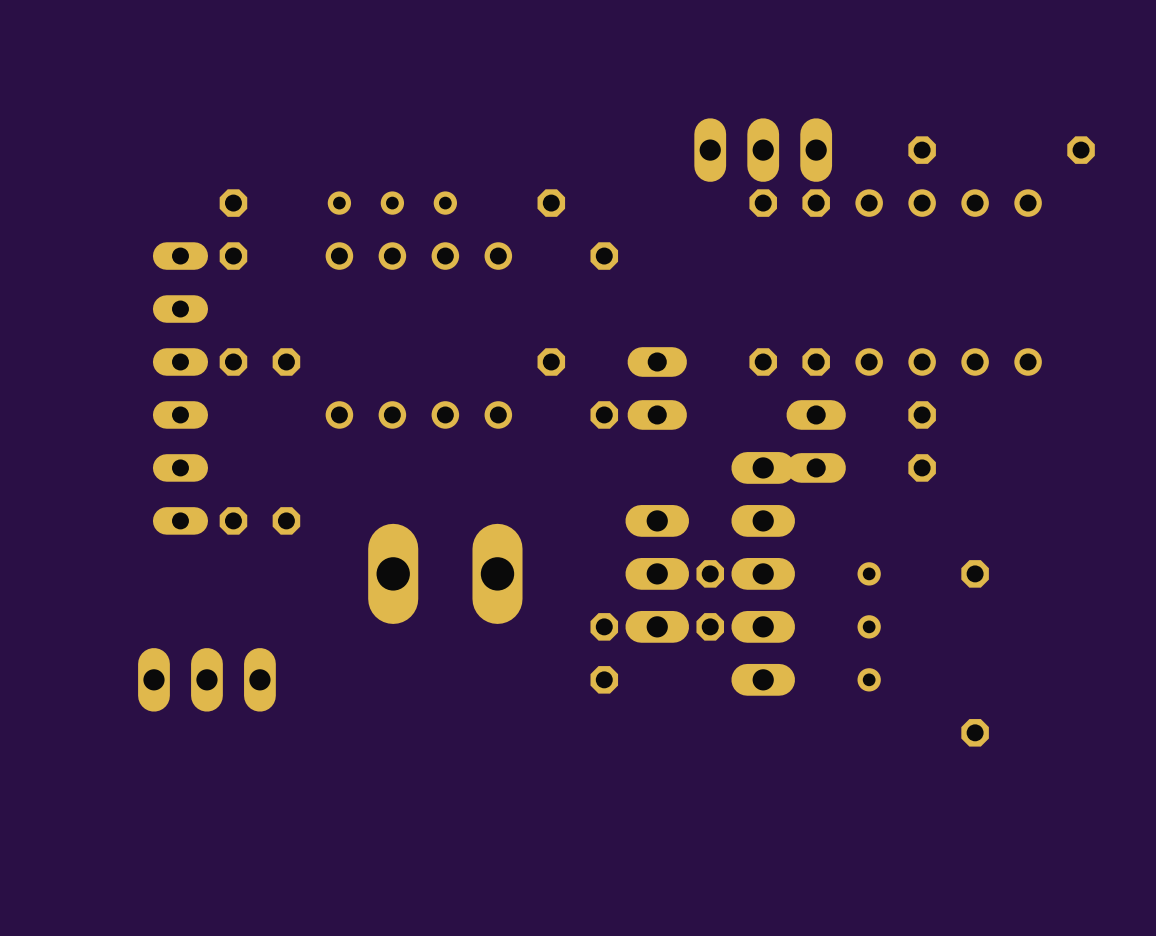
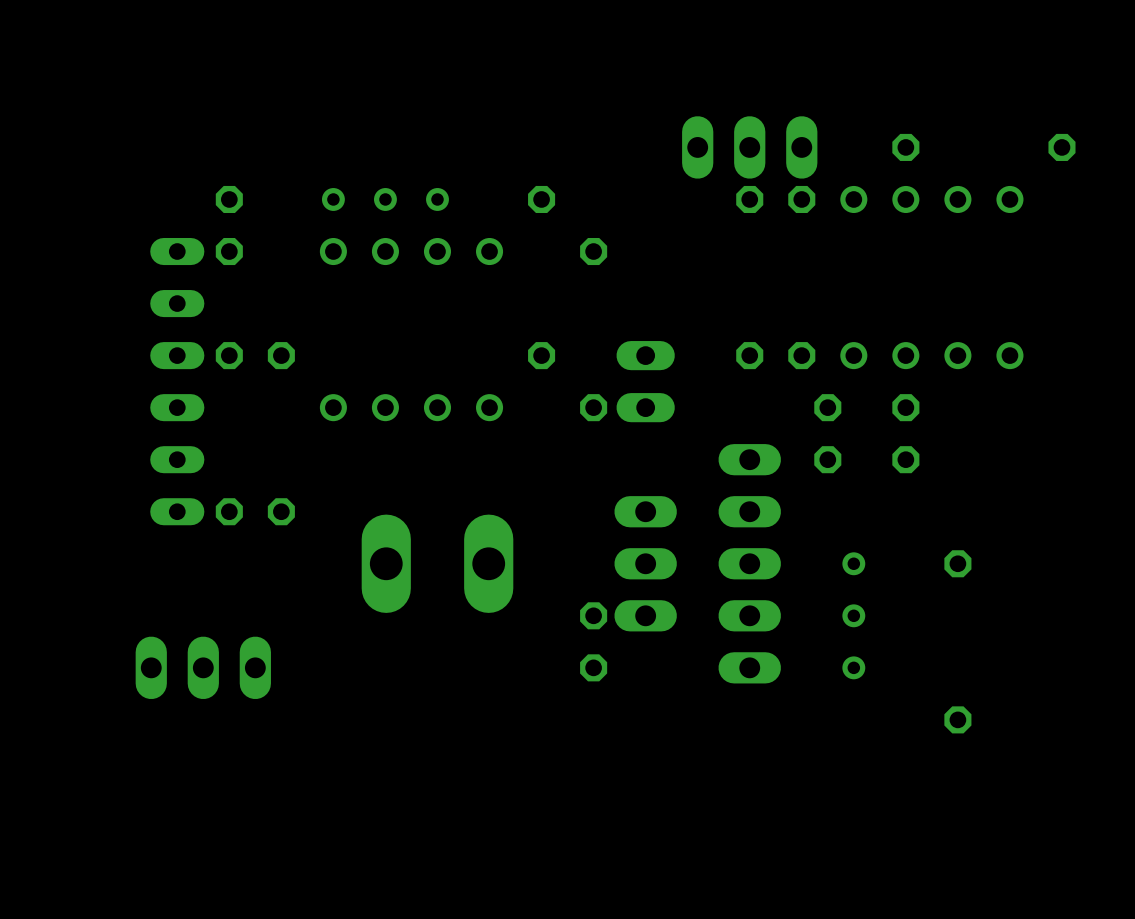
part: (816, 441) -> none
part position: (710, 600) -> (827, 433)

